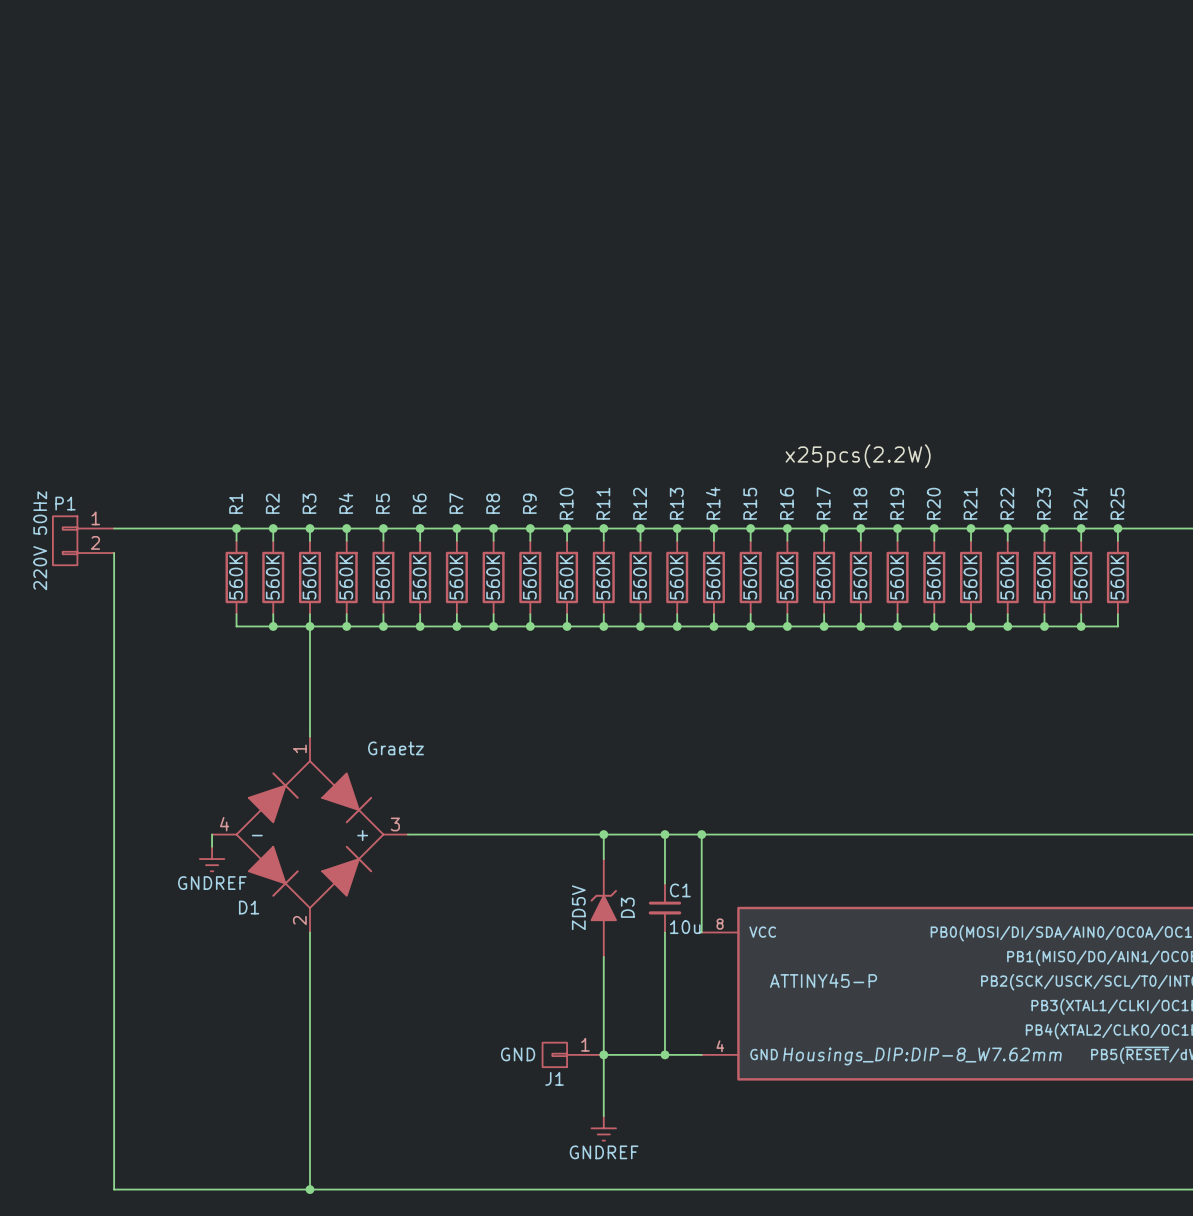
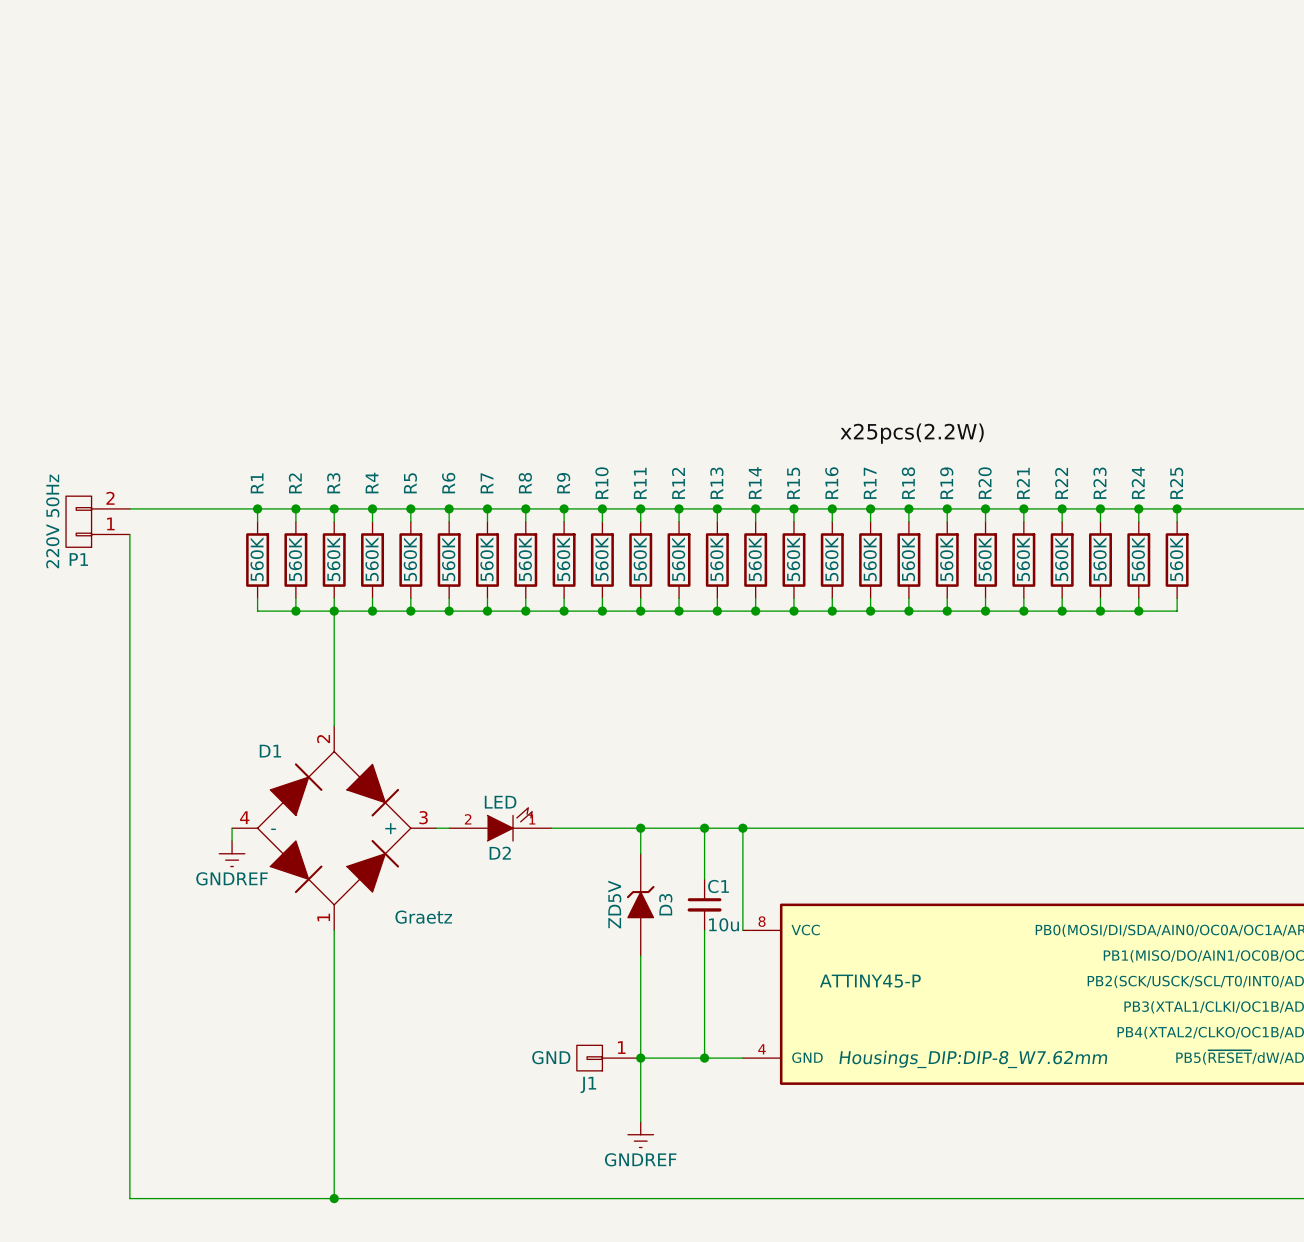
P1 flip: as is (65, 540) -> up-down (78, 521)
D2: none -> LED (500, 824)
D1 flip: as is (309, 834) -> up-down (334, 828)

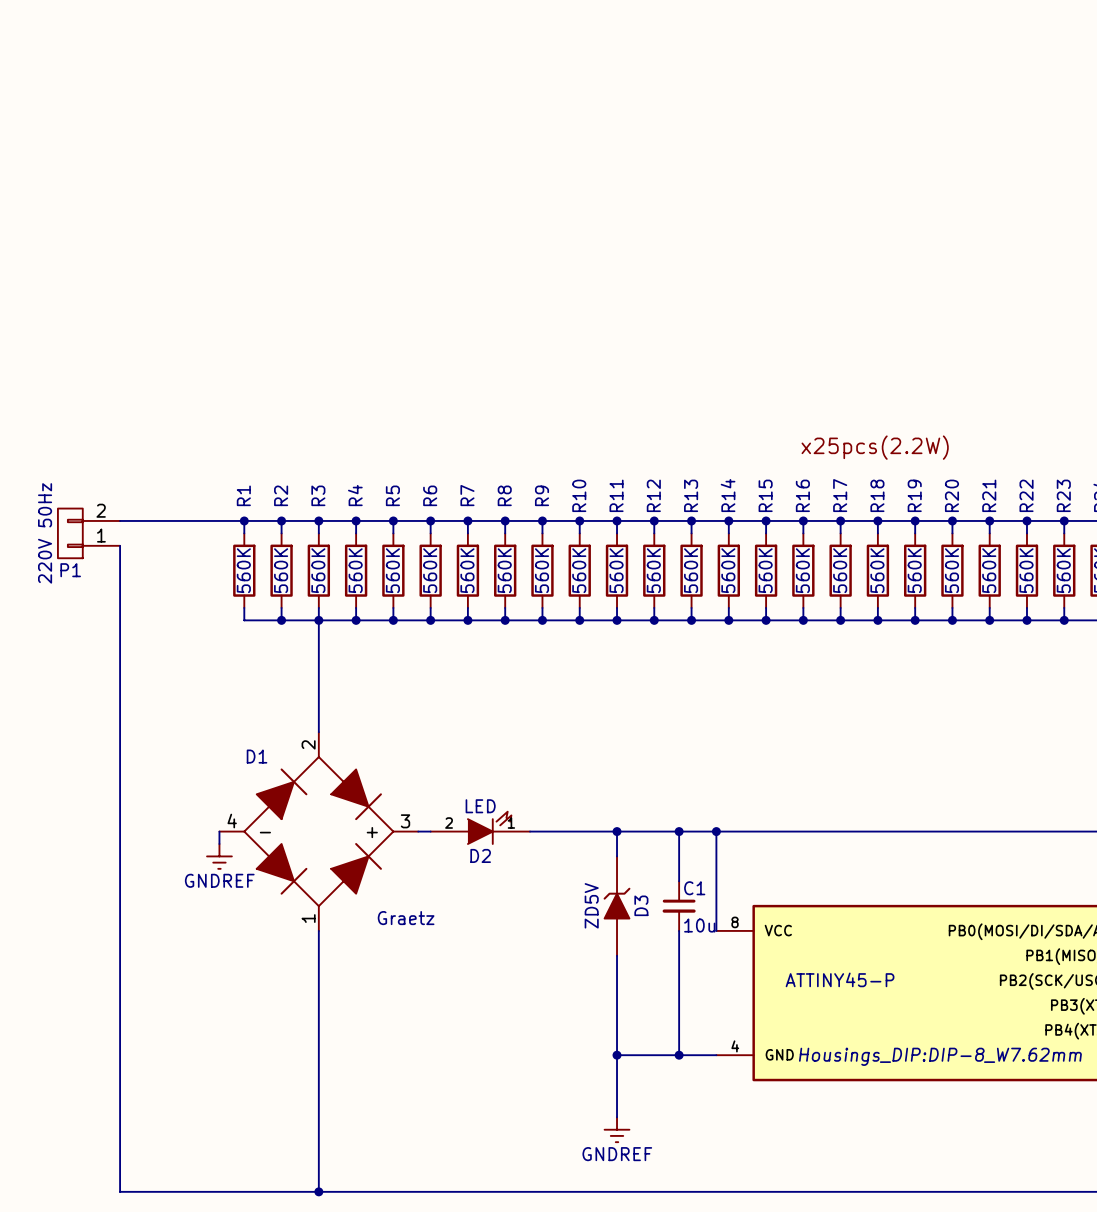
J1: GND (608, 1058) -> none

